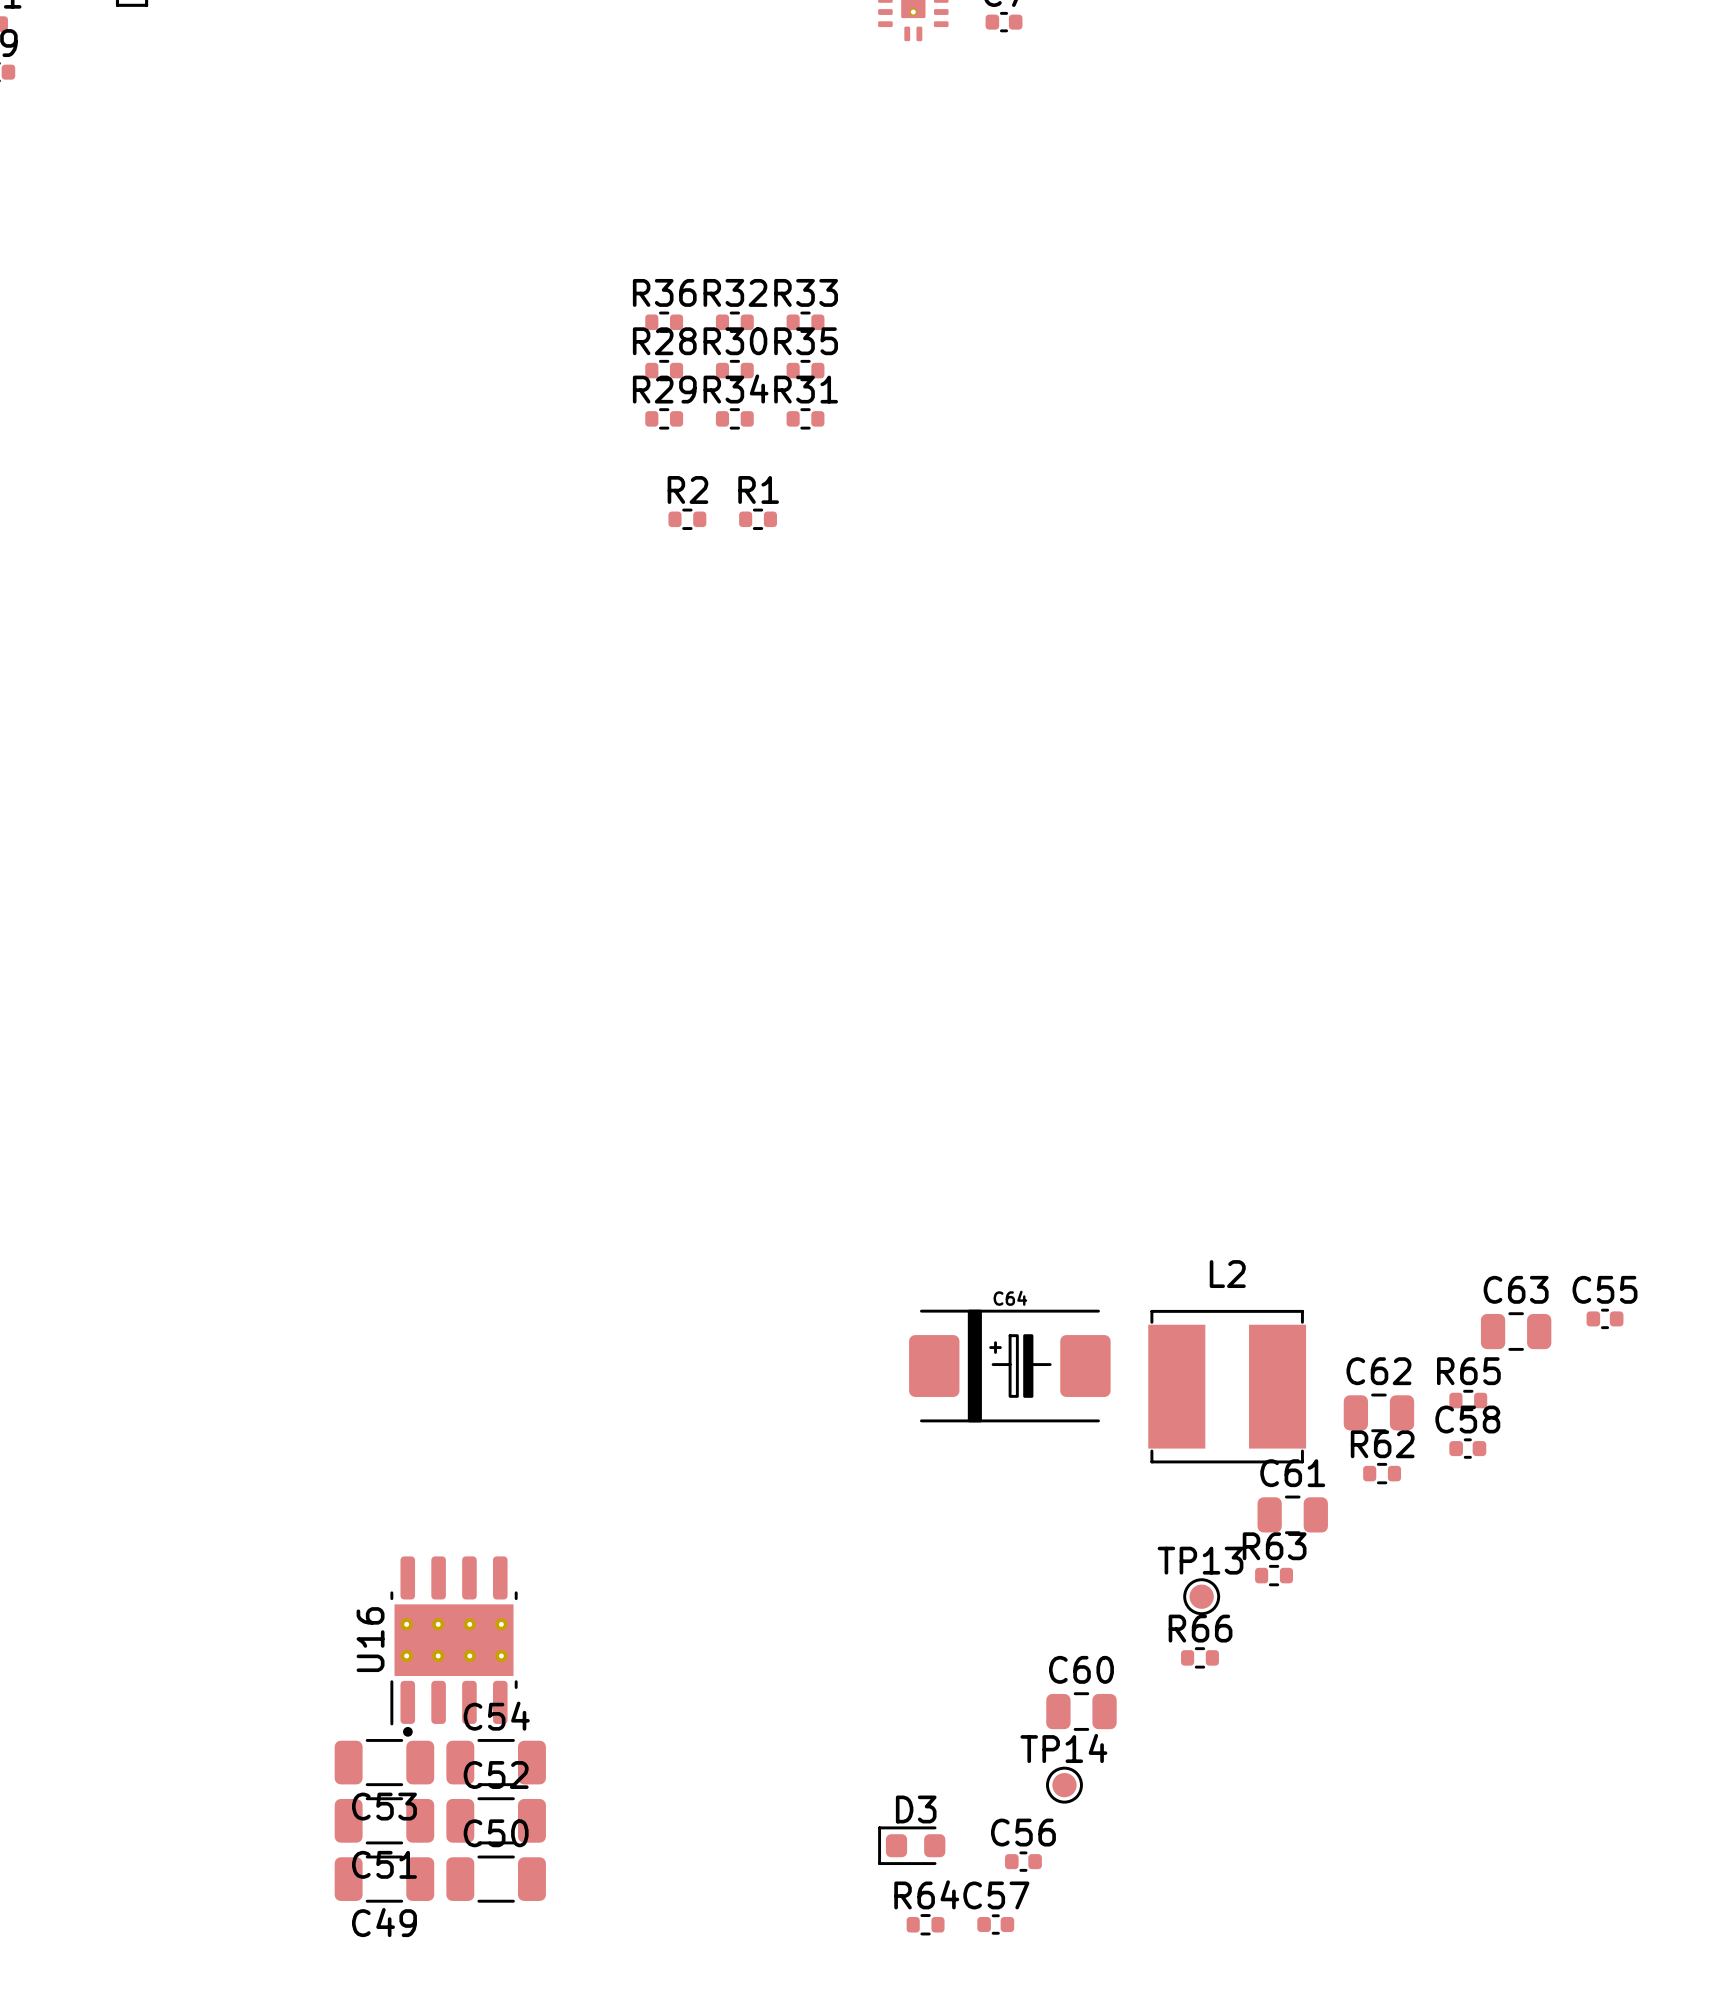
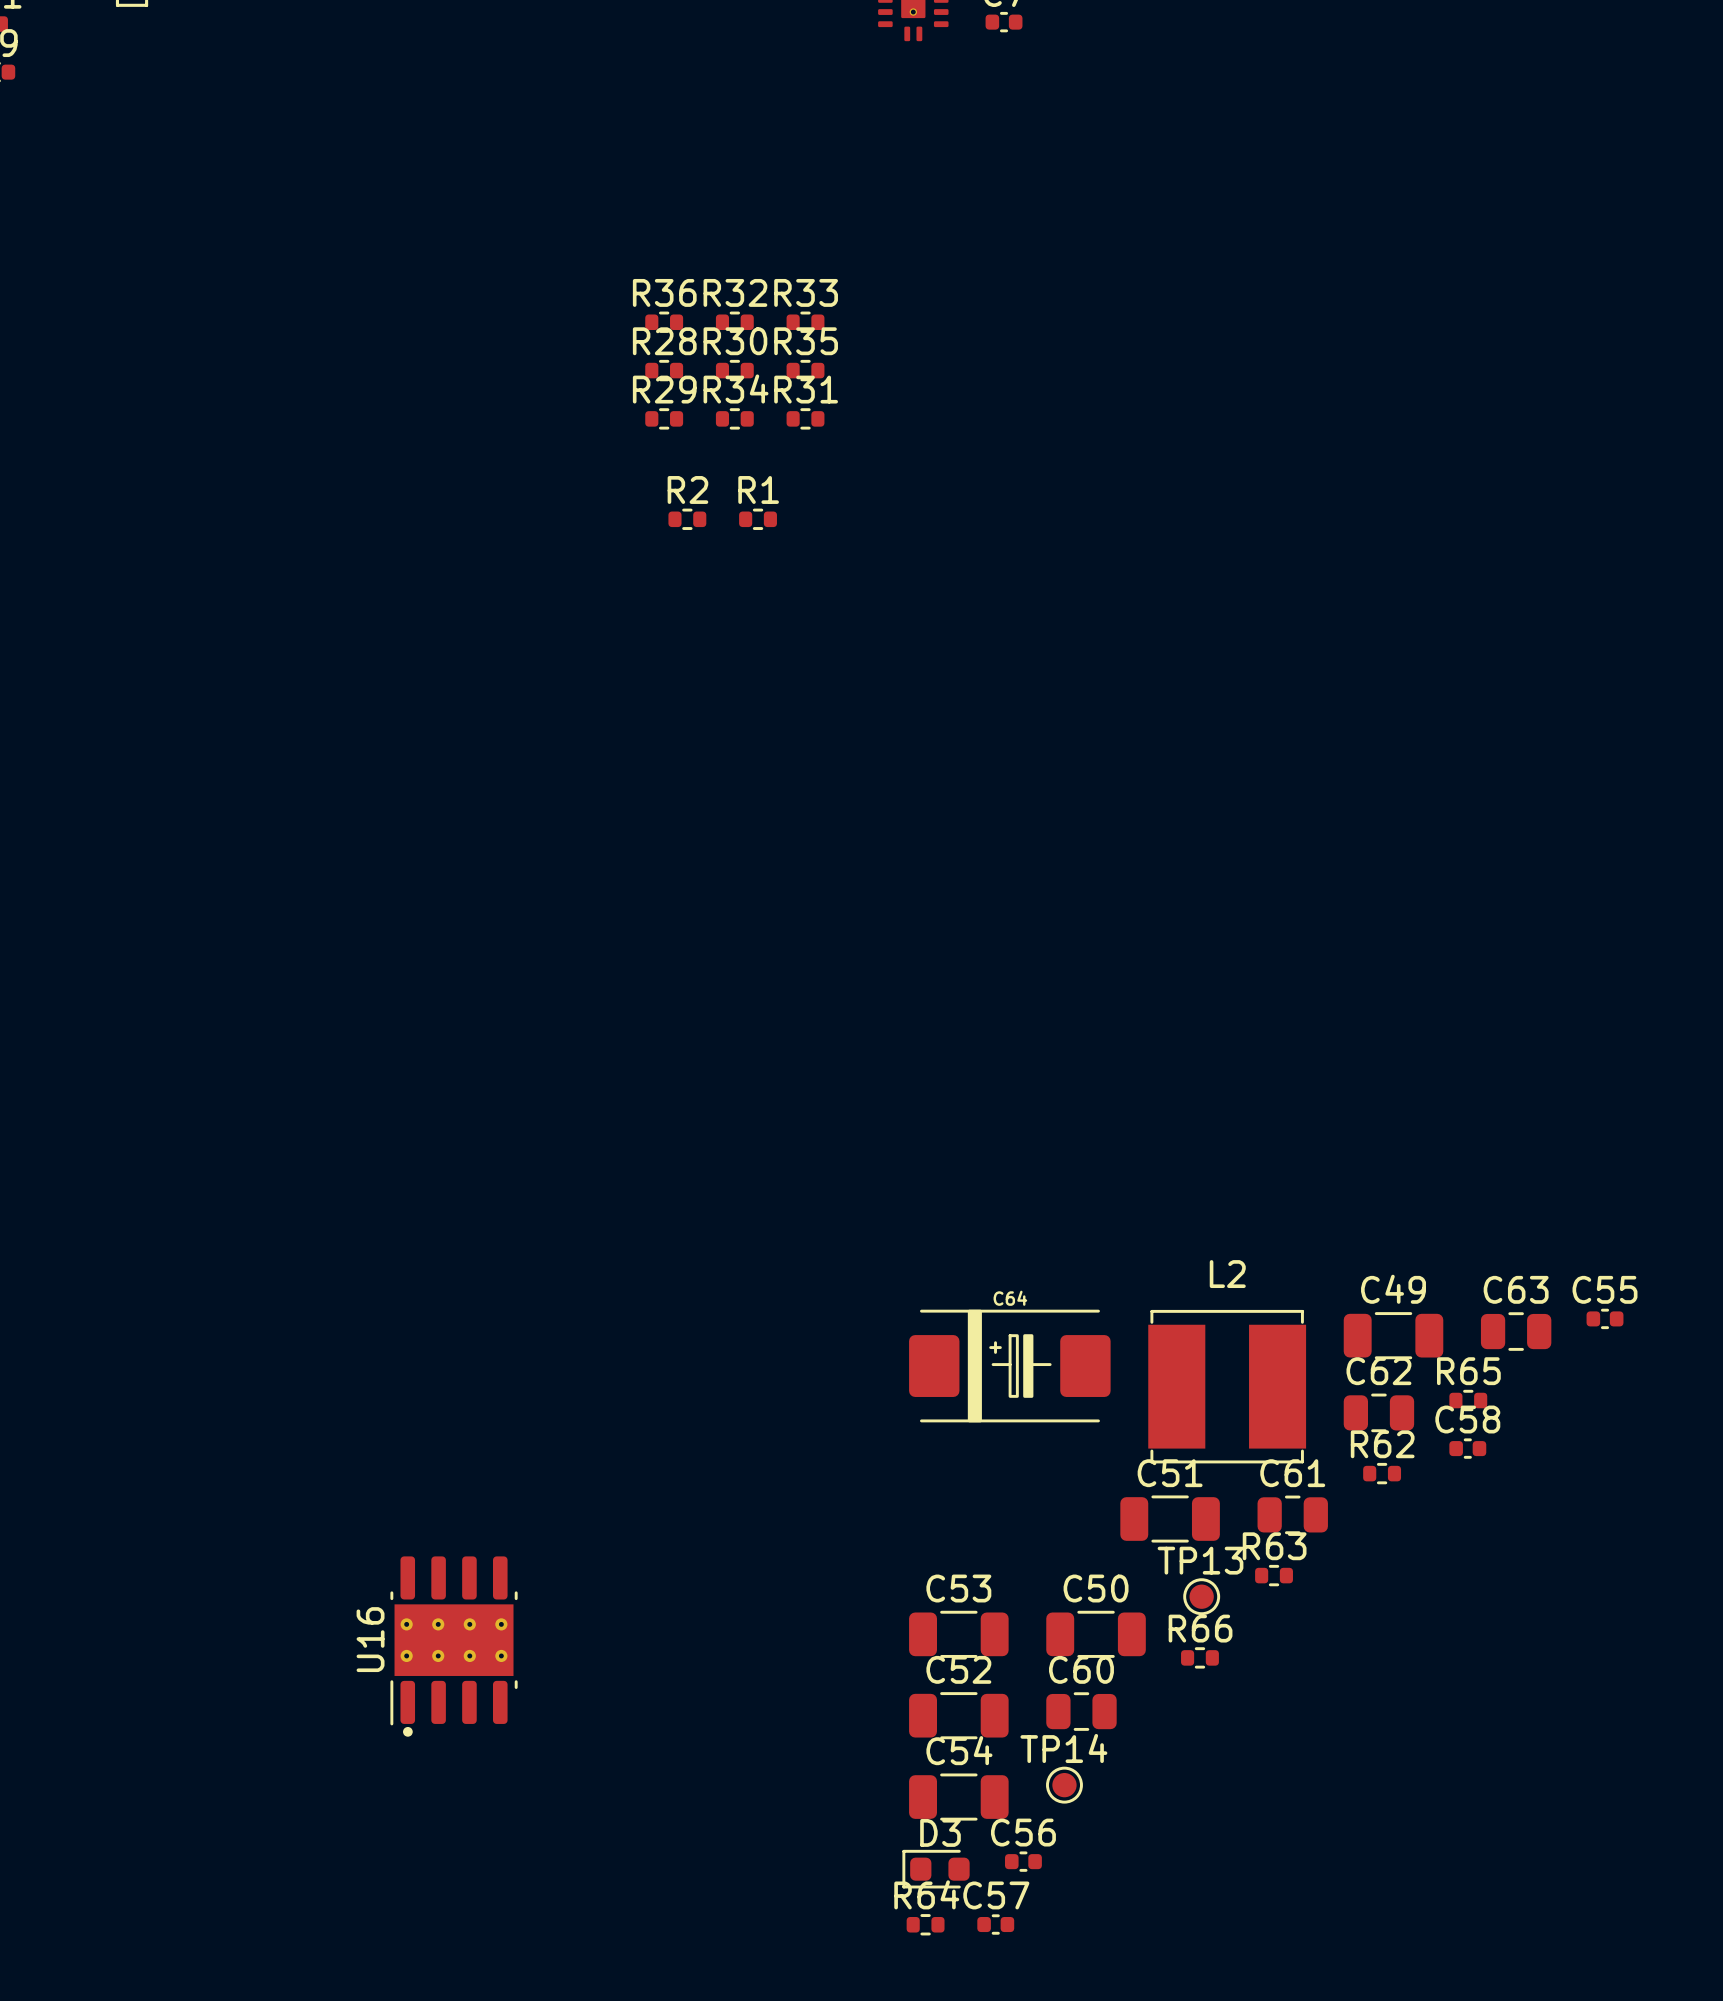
C53 position: (384, 1762) -> (958, 1634)
C54 position: (496, 1762) -> (958, 1797)
C53 name position: C53 (384, 1806) -> C53 (958, 1588)
C51 position: (384, 1820) -> (1170, 1519)
C52 position: (496, 1820) -> (958, 1715)
D3 position: (911, 1845) -> (936, 1869)
C51 name position: C51 (384, 1864) -> C51 (1170, 1473)
C49 position: (384, 1879) -> (1393, 1335)
C50 position: (496, 1879) -> (1096, 1634)
C49 name position: C49 (384, 1922) -> C49 (1393, 1289)

